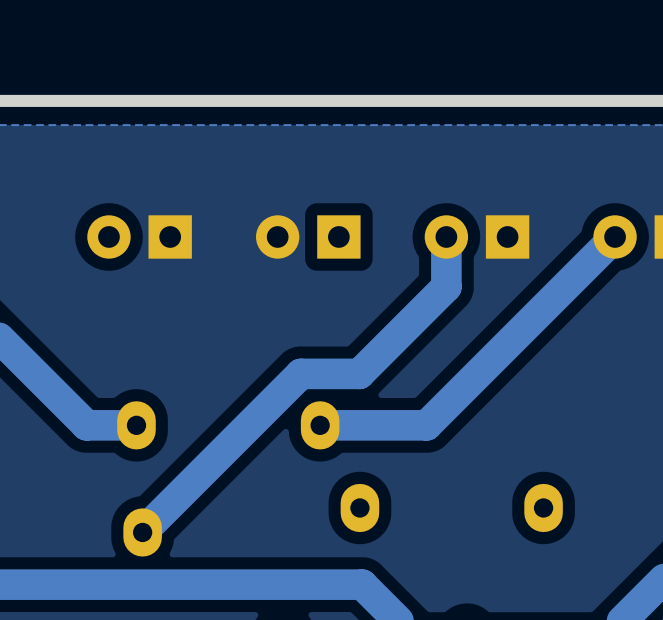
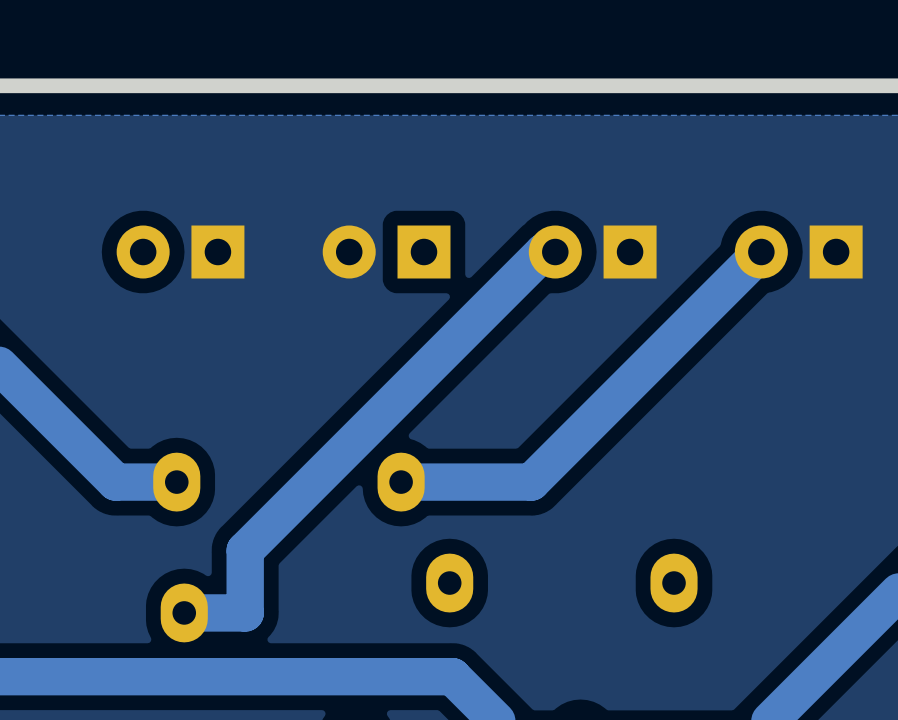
track: (446, 236) (446, 286) (359, 373) (300, 373) (142, 532) -> (555, 252) (543, 252) (245, 550) (245, 612) (184, 612)

